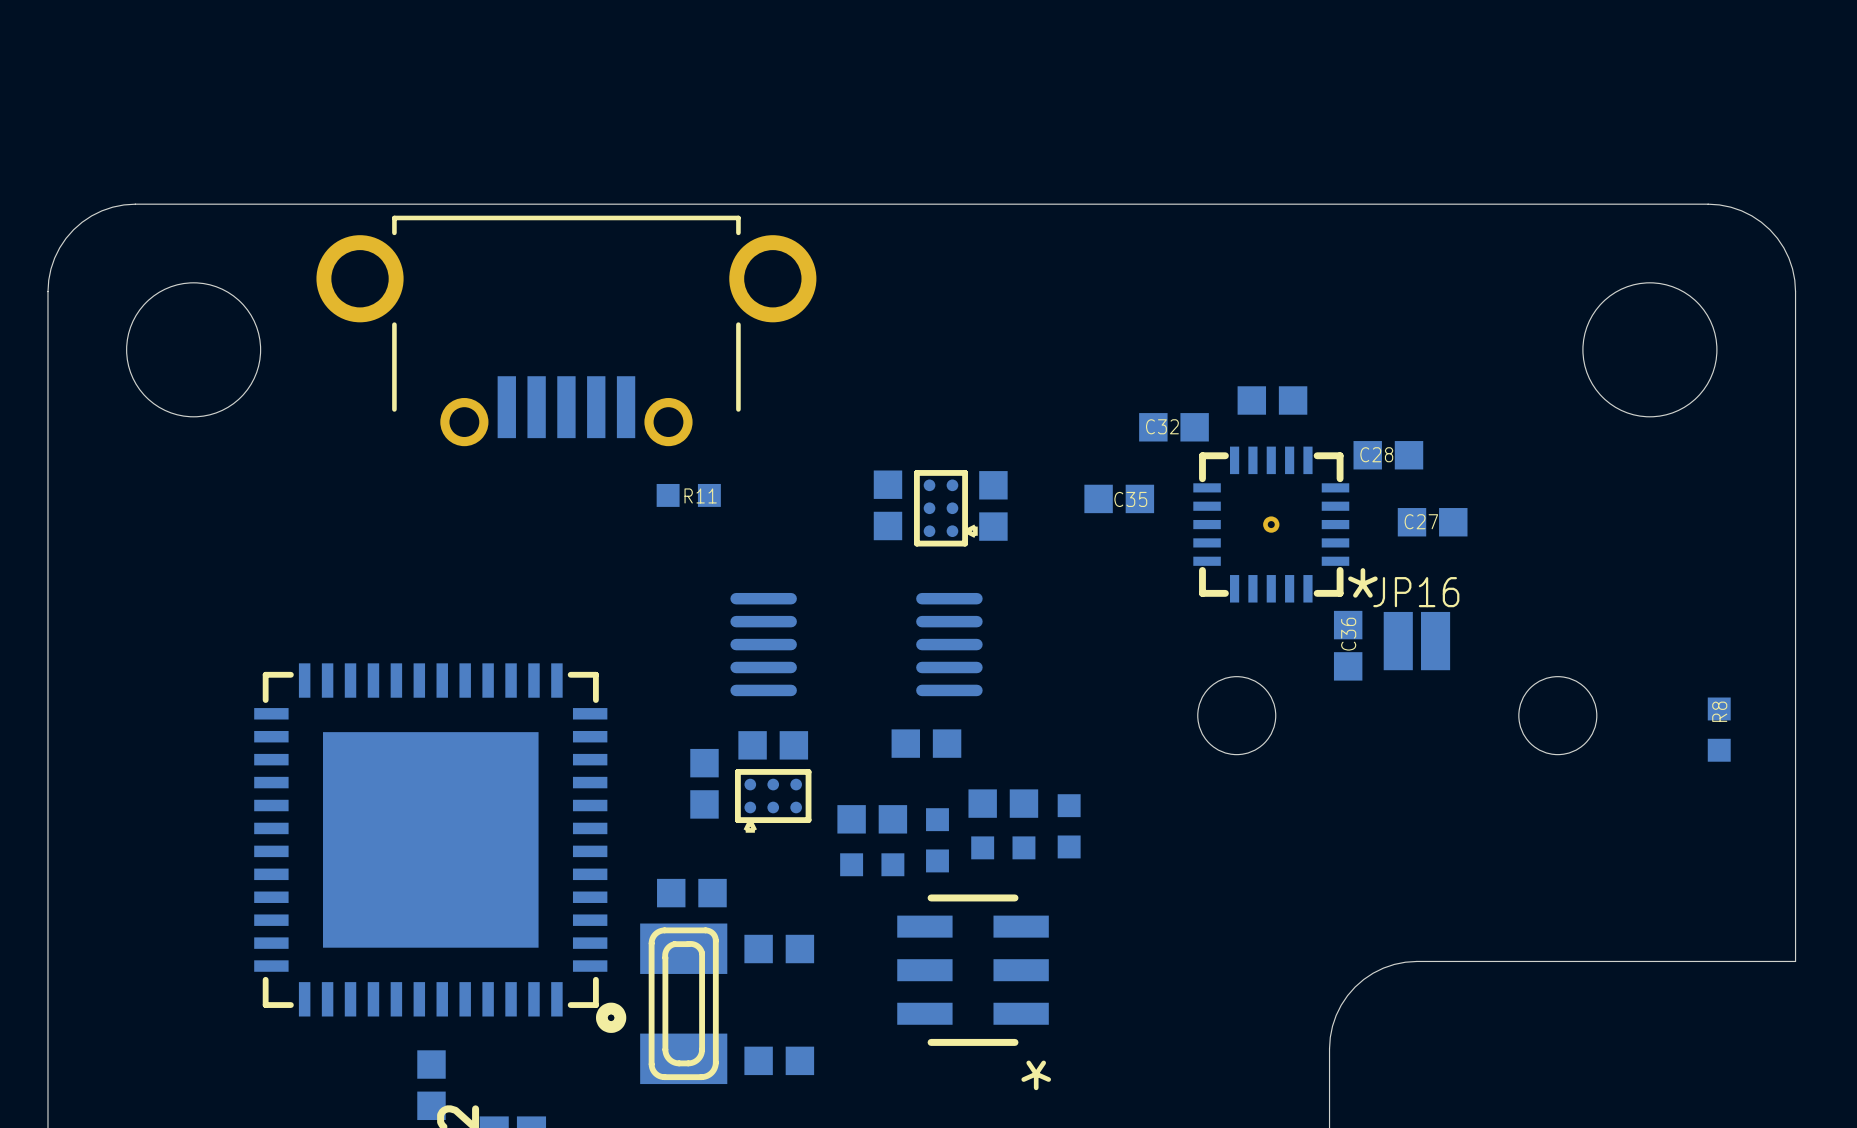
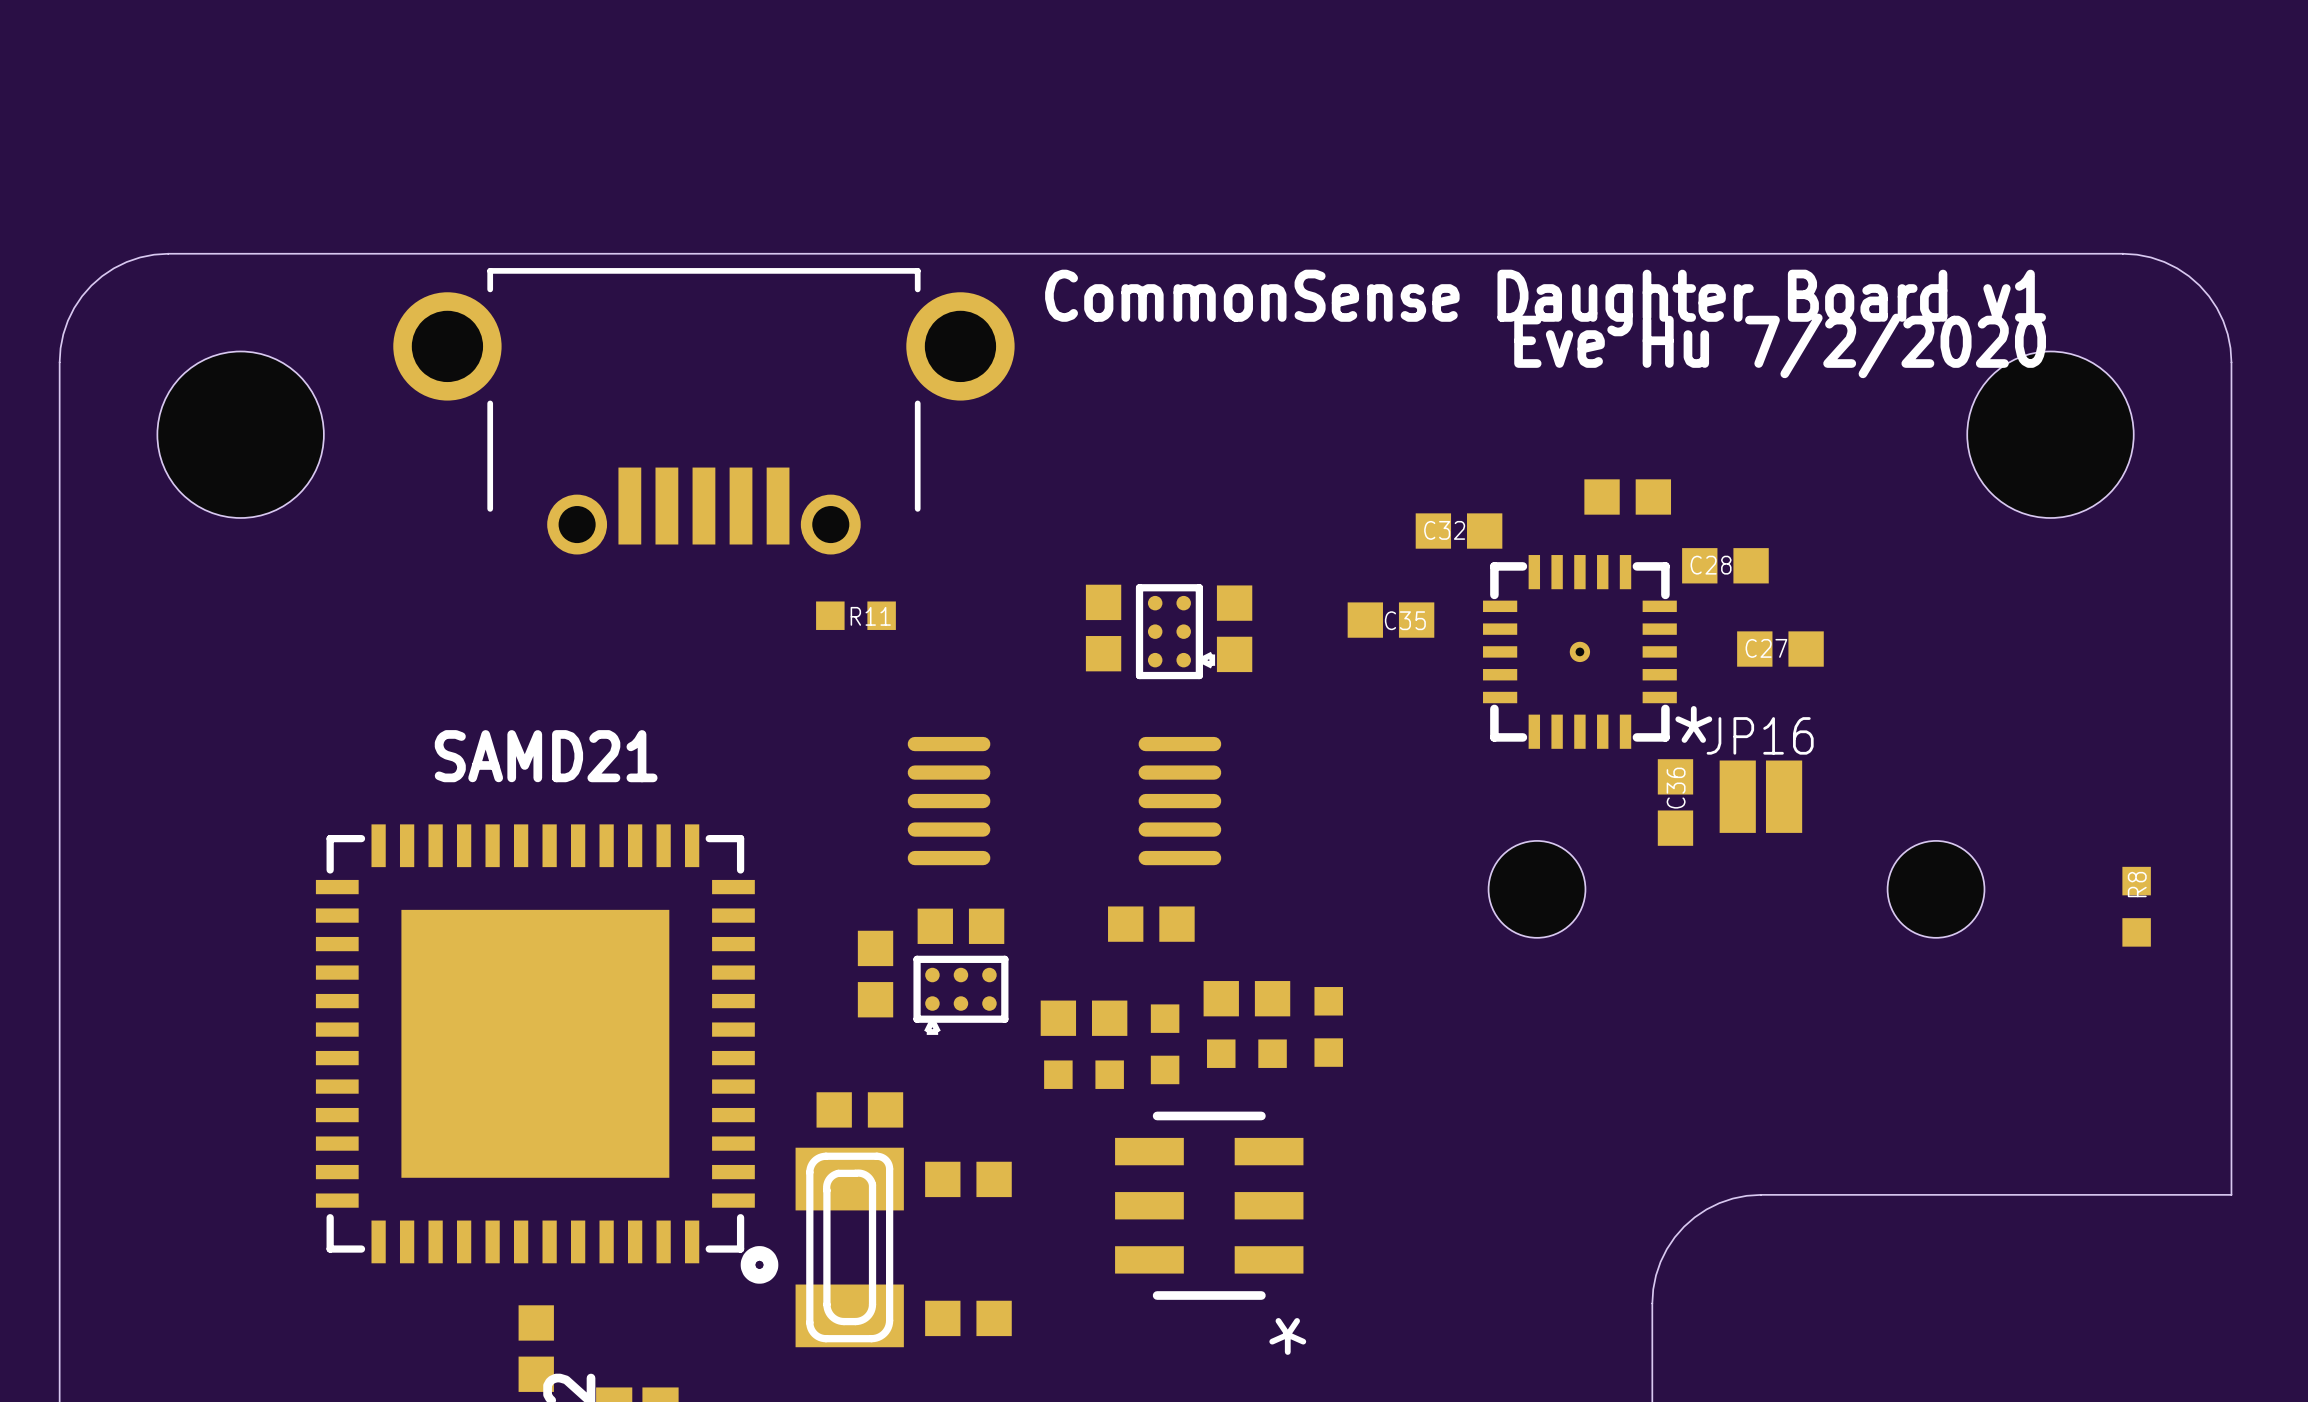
text: none -> CommonSense Daughter Board v1 (1545, 302)
text: none -> Eve Hu 7/2/2020 (1780, 345)
part position: (1272, 400) -> (1627, 497)
text: none -> SAMD21 (546, 756)

